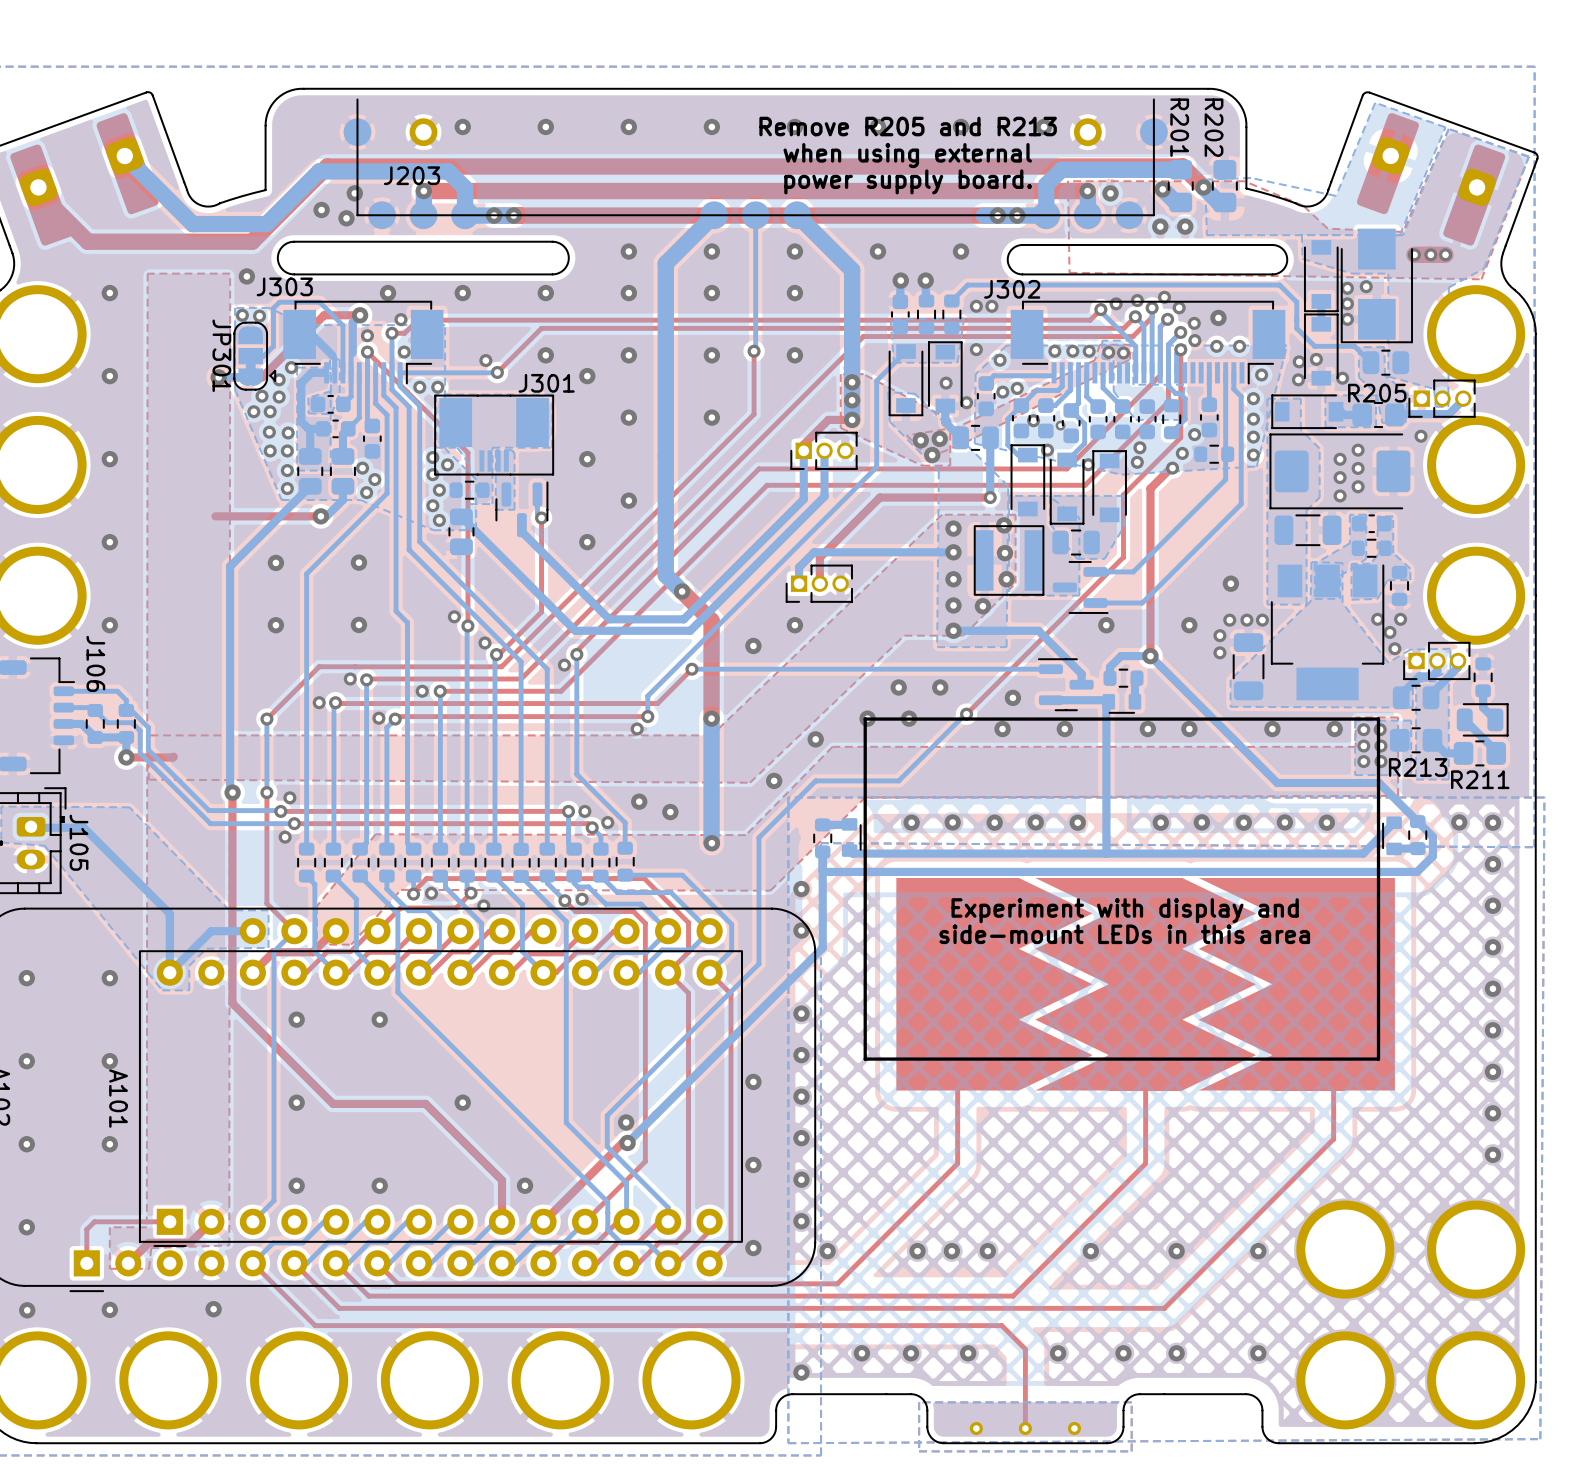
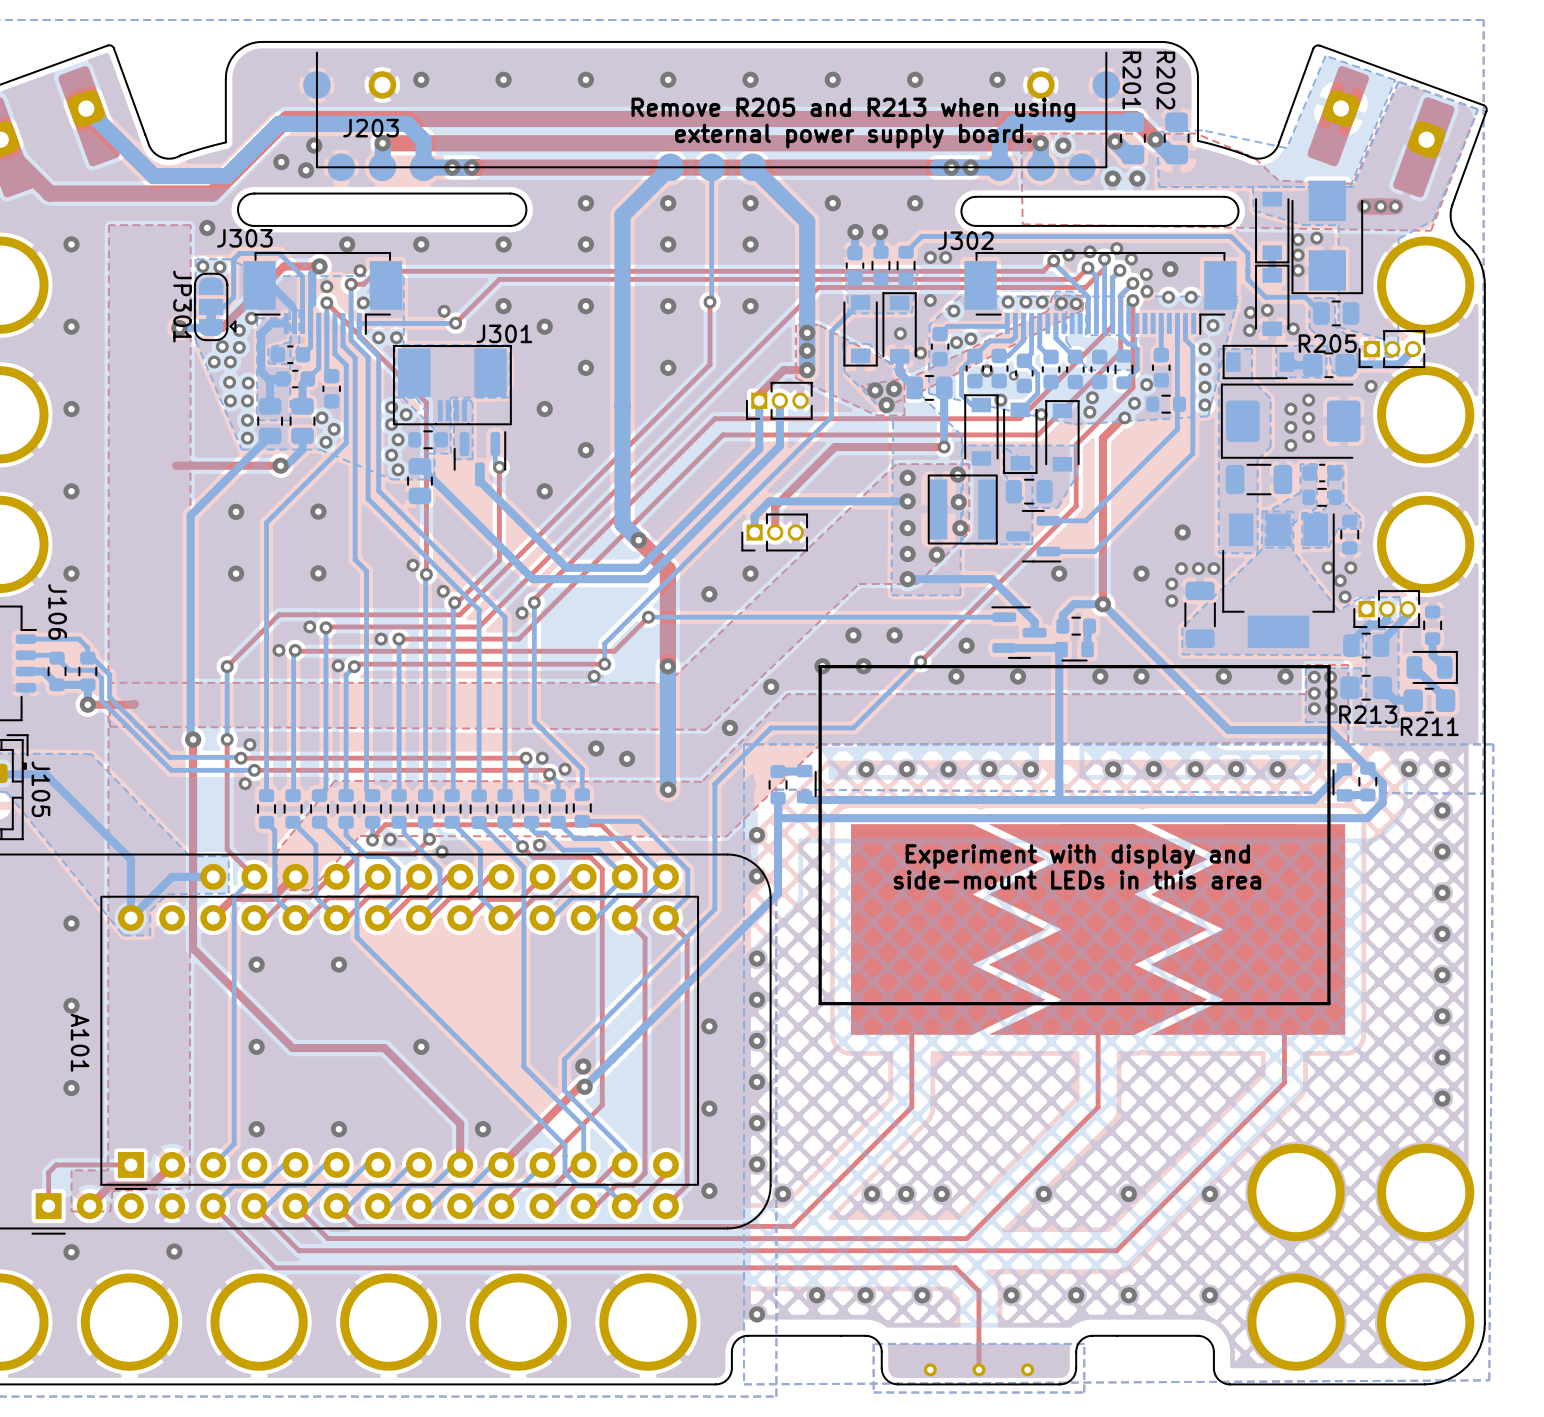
text: Remove R205 and R213 (908, 126) -> none
text: when using external (907, 155) -> Remove R205 and R213 when using (853, 109)
text: power supply board. (908, 181) -> external power supply board. (853, 136)

